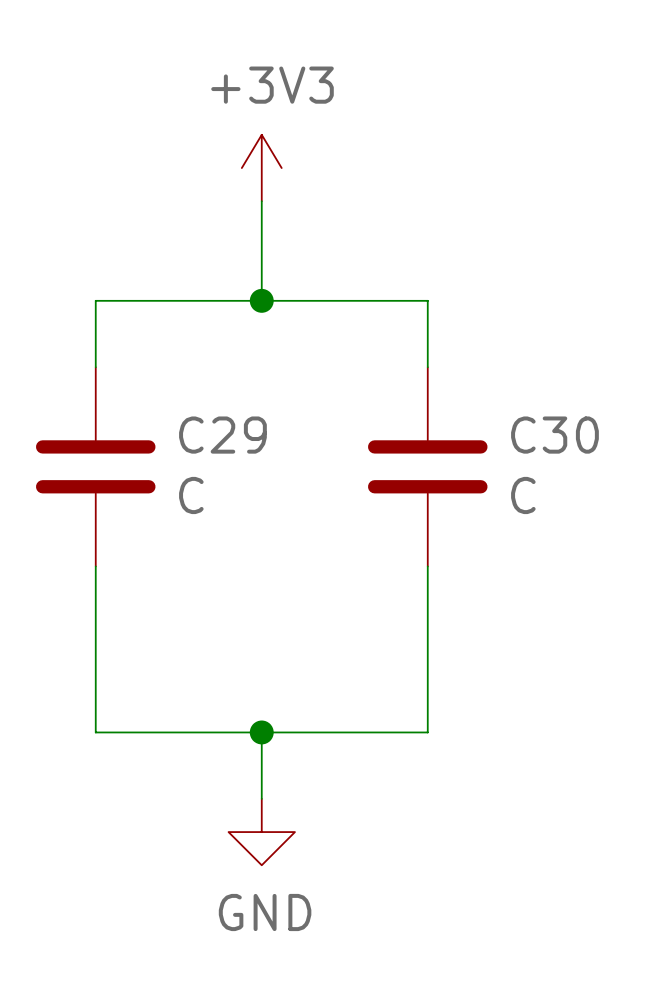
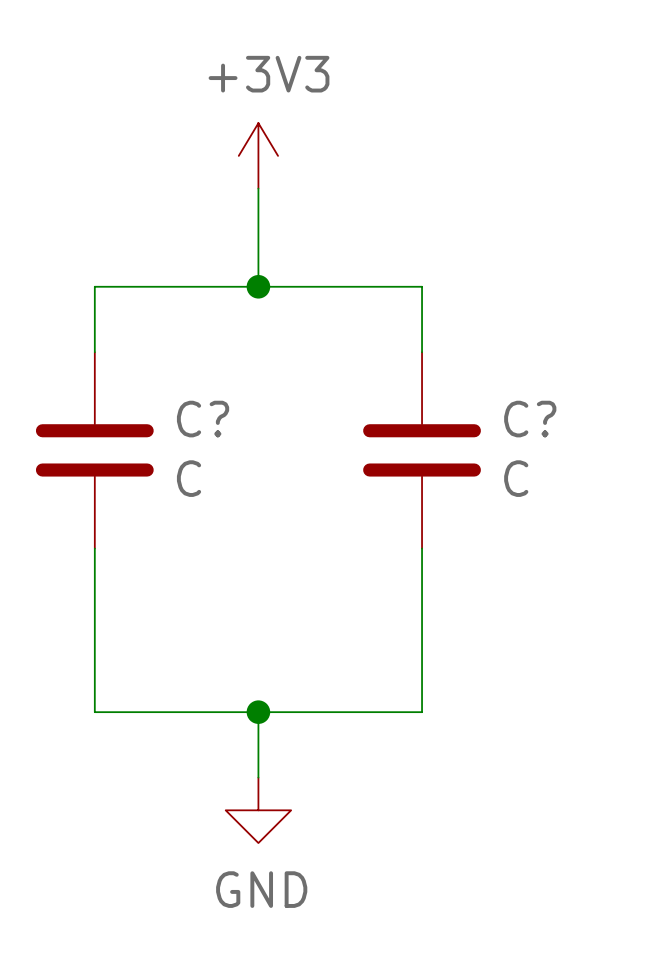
C29 name: C29 (222, 435) -> C? (203, 419)
C30 name: C30 (554, 435) -> C? (530, 419)

